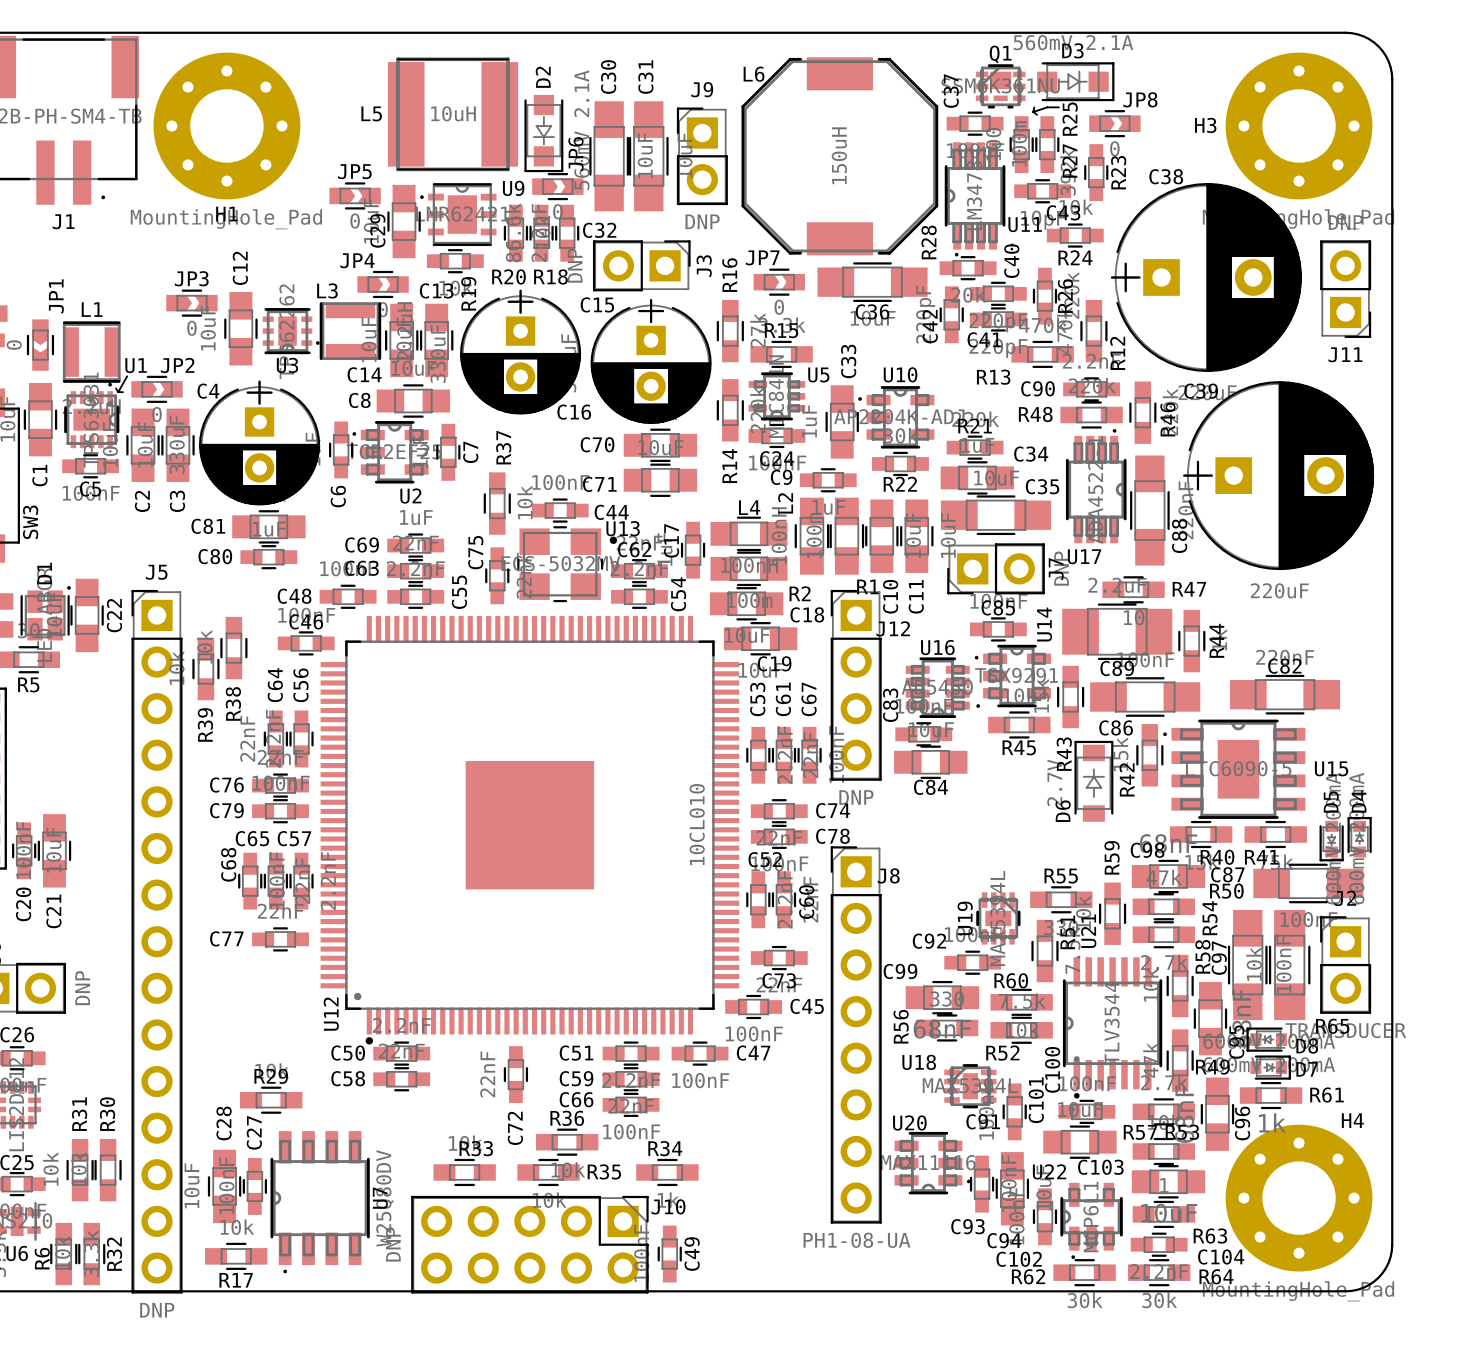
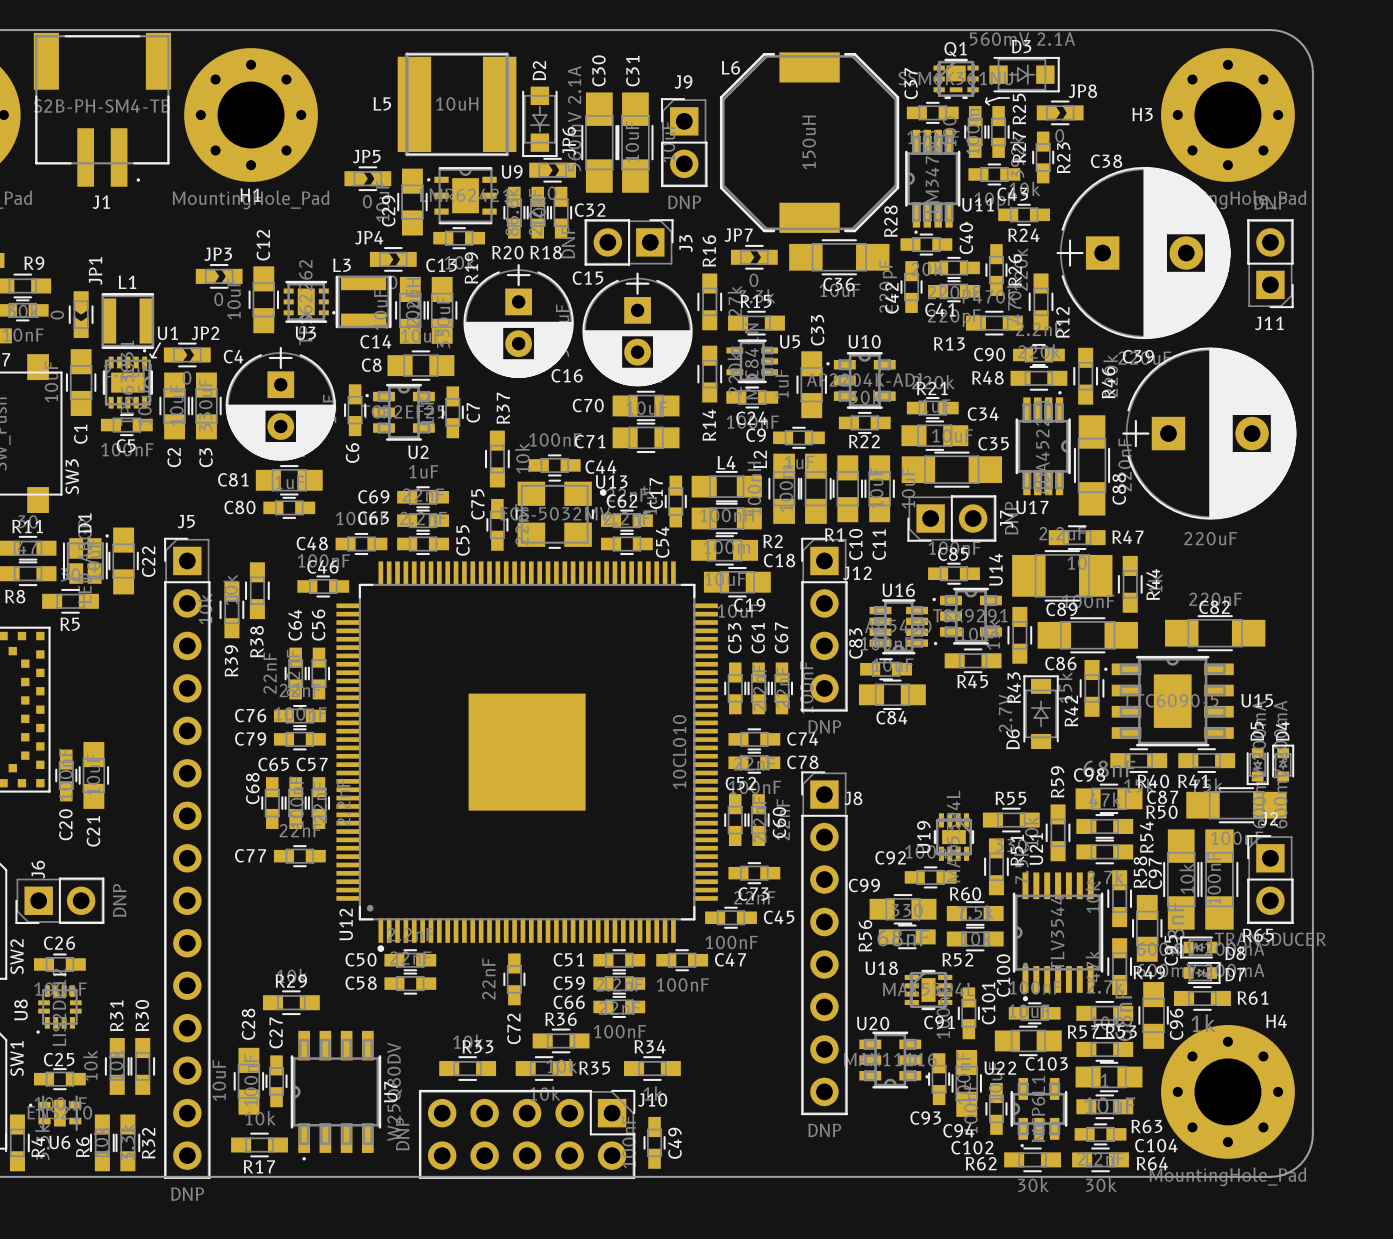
J8 value: PH1-08-UA (856, 1240) -> DNP (824, 1130)

